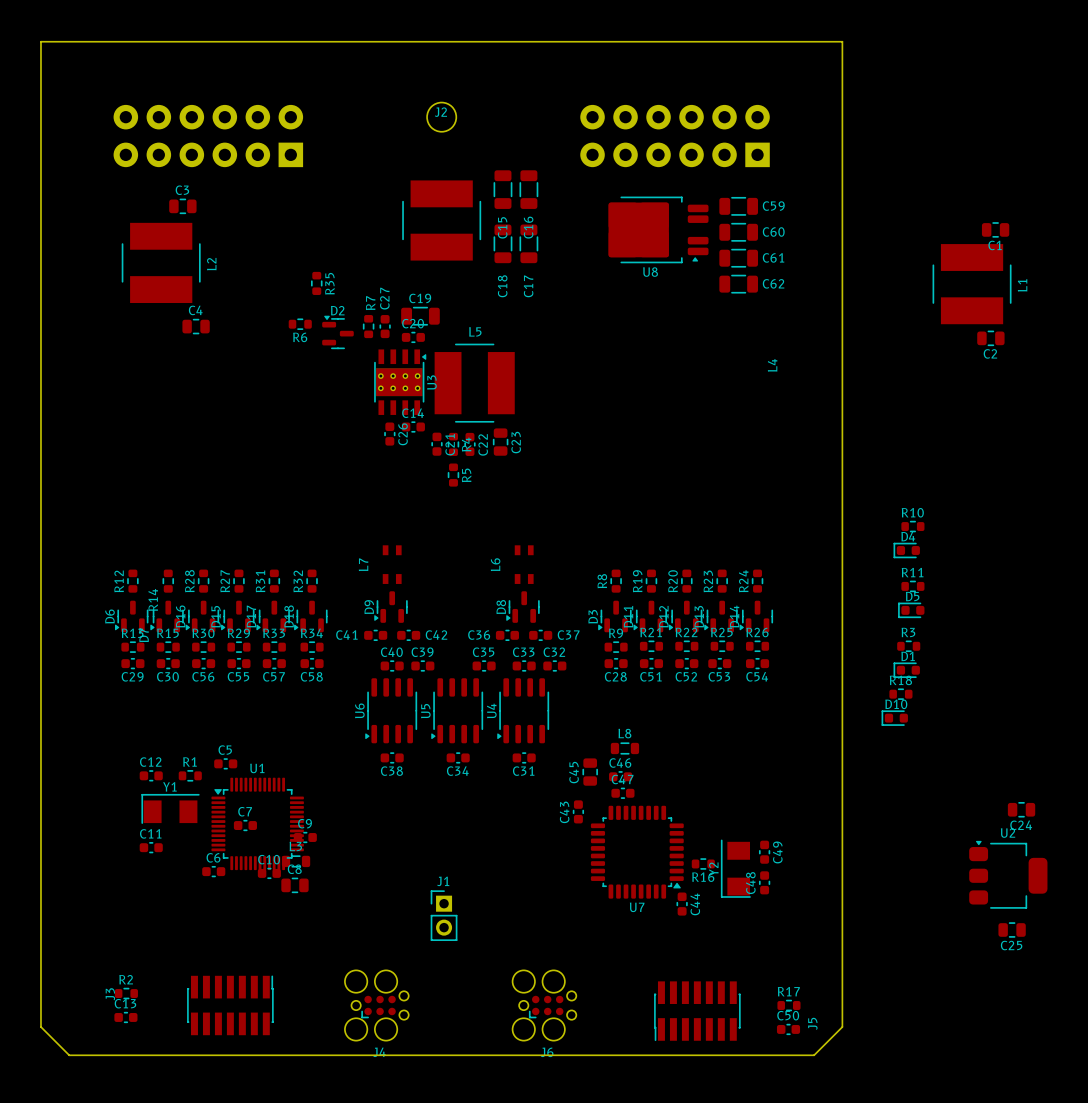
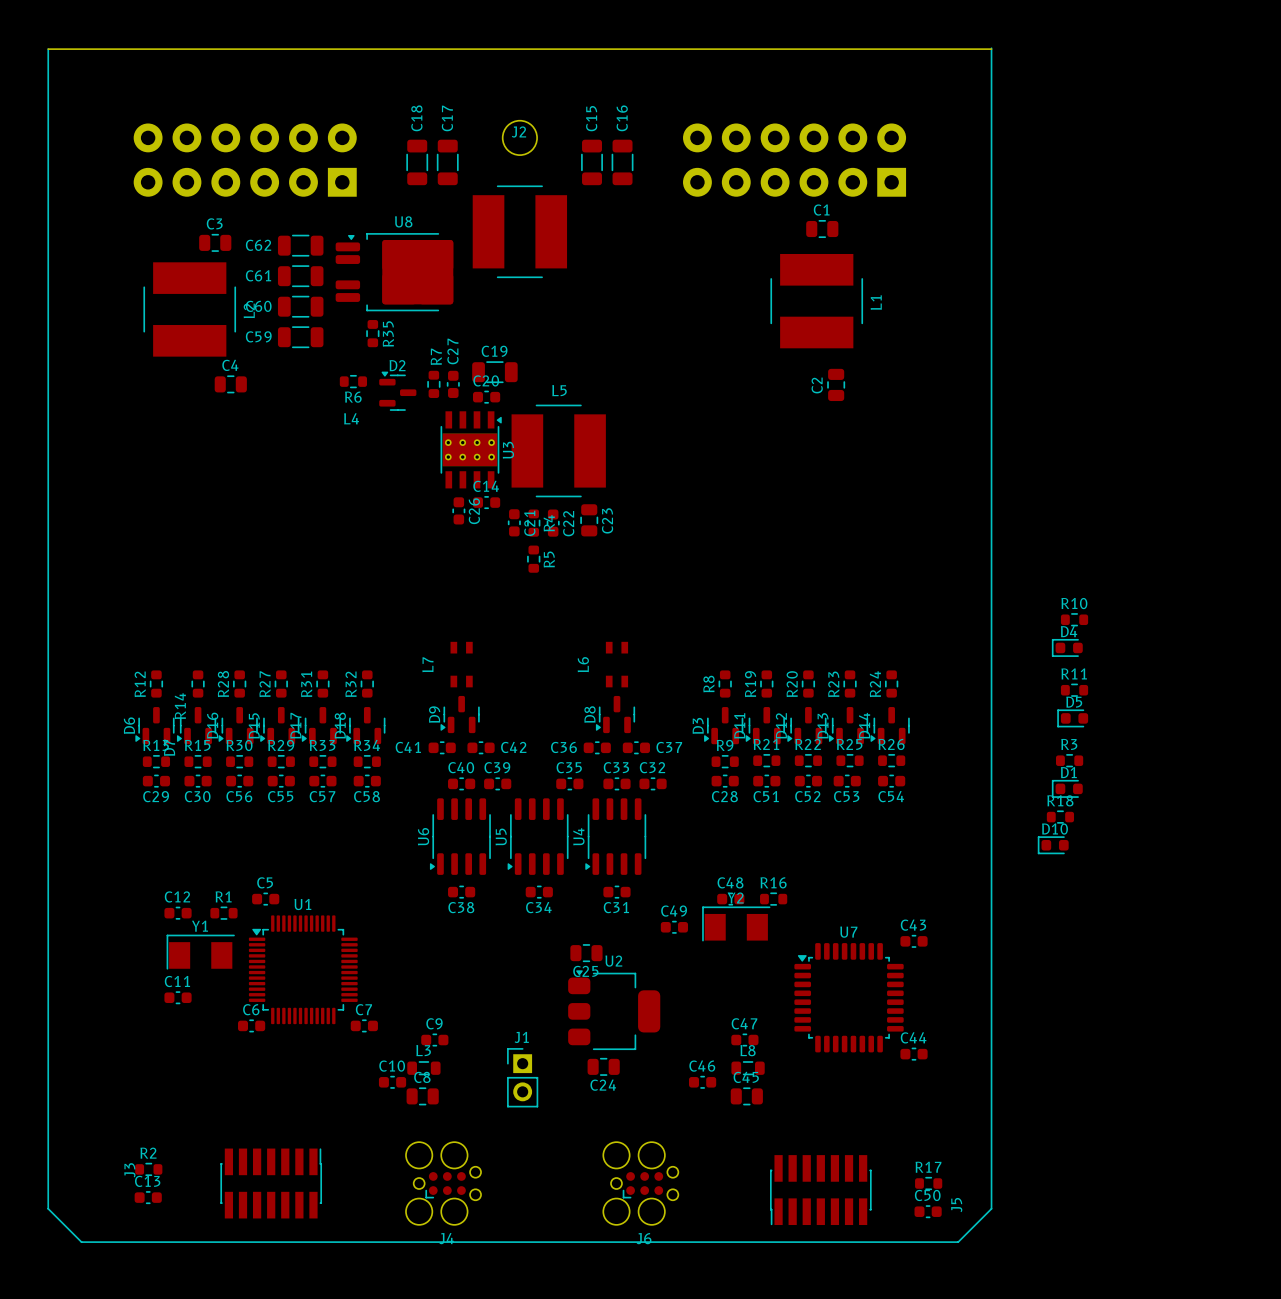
J2 footprint: [40, 41, 843, 1056] -> [47, 47, 993, 1243]
C15 position: (502, 189) -> (592, 162)
C16 position: (528, 189) -> (622, 162)
C59 position: (738, 206) -> (300, 337)
C59 name position: C59 (773, 206) -> C59 (258, 336)
L4 rotation: 0° (441, 220) -> 90° clockwise (519, 231)
C15 name position: C15 (502, 227) -> C15 (591, 118)
C16 name position: C16 (528, 227) -> C16 (622, 118)
U8 rotation: 0° (658, 229) -> 180° (394, 272)
U8 position: (658, 229) -> (394, 272)
C1 position: (995, 229) -> (822, 229)
C60 name position: C60 (773, 231) -> C60 (258, 306)
C60 position: (738, 232) -> (300, 306)
C18 position: (502, 243) -> (417, 162)
C17 position: (528, 243) -> (447, 162)
C1 name position: C1 (995, 245) -> C1 (821, 210)
C61 name position: C61 (773, 257) -> C61 (258, 275)
C61 position: (738, 258) -> (300, 276)
C62 name position: C62 (773, 283) -> C62 (258, 245)
C62 position: (738, 284) -> (300, 245)
L1 position: (972, 284) -> (816, 301)
C18 name position: C18 (502, 286) -> C18 (416, 118)
C17 name position: C17 (528, 286) -> C17 (447, 118)
C2 rotation: 0° (990, 338) -> 90° clockwise (836, 384)
C2 position: (990, 338) -> (836, 384)
L4 name position: L4 (772, 365) -> L4 (351, 418)
L8 position: (624, 748) -> (748, 1068)
C45 rotation: 0° (590, 772) -> 90° clockwise (746, 1096)
C45 position: (590, 772) -> (746, 1096)
C46 position: (620, 776) -> (702, 1082)
C47 position: (622, 793) -> (744, 1040)
C24 position: (1021, 809) -> (603, 1066)
C43 rotation: 0° (578, 811) -> 90° clockwise (914, 941)
C43 position: (578, 811) -> (914, 941)
C7 position: (245, 825) -> (364, 1025)
C9 position: (305, 837) -> (434, 1040)
U7 rotation: 0° (637, 852) -> 180° (849, 997)
U7 position: (637, 852) -> (849, 997)
C49 rotation: 0° (764, 852) -> 90° clockwise (674, 927)
C49 position: (764, 852) -> (674, 927)
C49 name position: C49 (777, 852) -> C49 (674, 911)
L3 position: (296, 861) -> (423, 1068)
R16 position: (703, 863) -> (773, 899)
Y2 rotation: 0° (735, 868) -> 90° clockwise (736, 923)
Y2 position: (735, 868) -> (736, 923)
C10 position: (269, 873) -> (392, 1082)
U2 position: (1008, 874) -> (614, 1010)
R16 name position: R16 (703, 877) -> R16 (773, 882)
C48 rotation: 0° (764, 882) -> 90° clockwise (730, 899)
C48 position: (764, 882) -> (730, 899)
C8 position: (294, 885) -> (422, 1096)
C44 rotation: 0° (682, 904) -> 90° clockwise (914, 1054)
C44 position: (682, 904) -> (914, 1054)
C44 name position: C44 (695, 904) -> C44 (913, 1037)
C25 position: (1012, 929) -> (586, 953)

